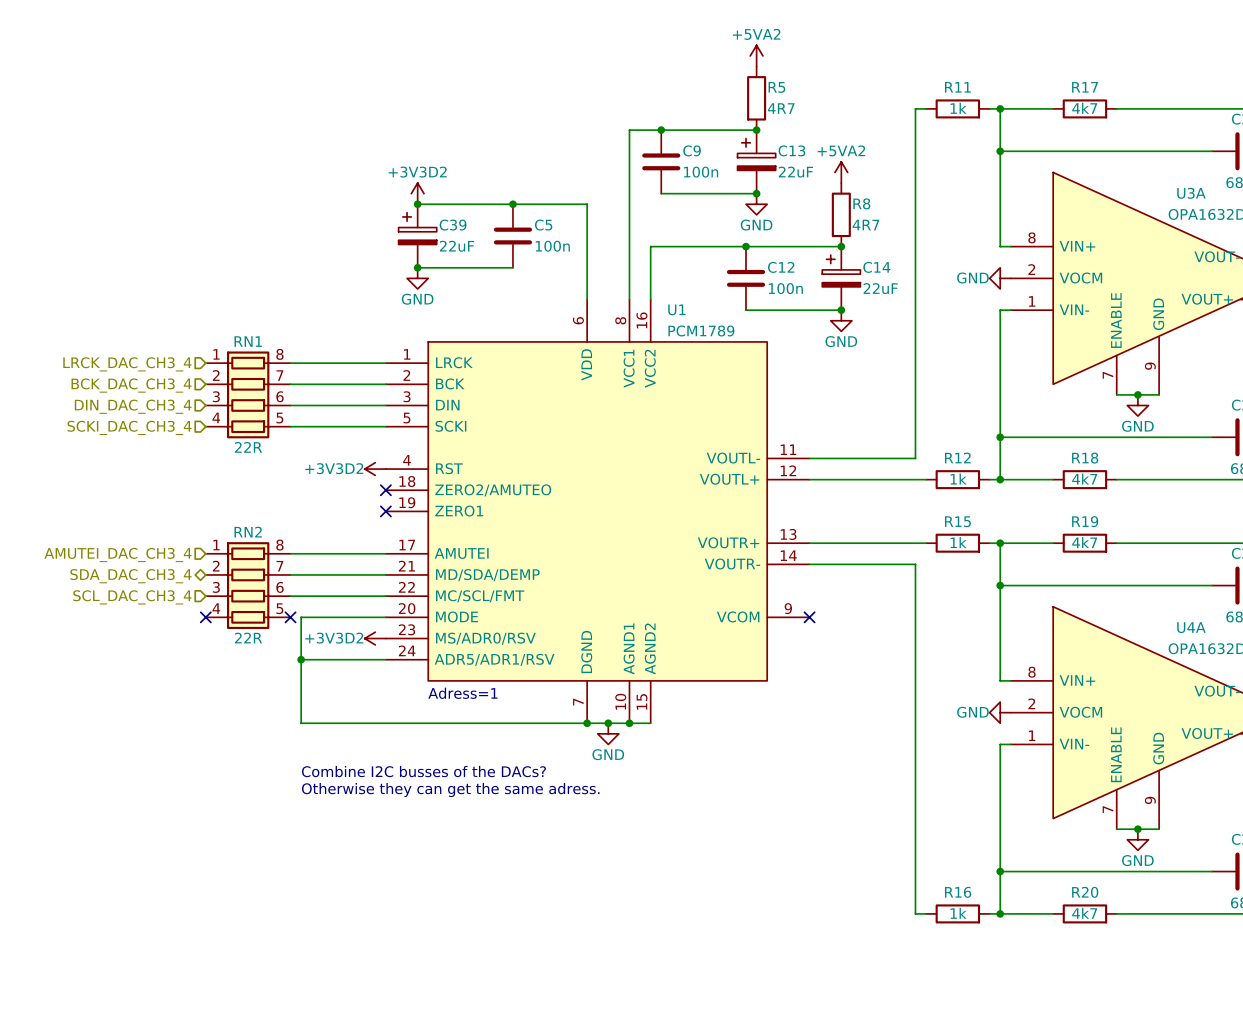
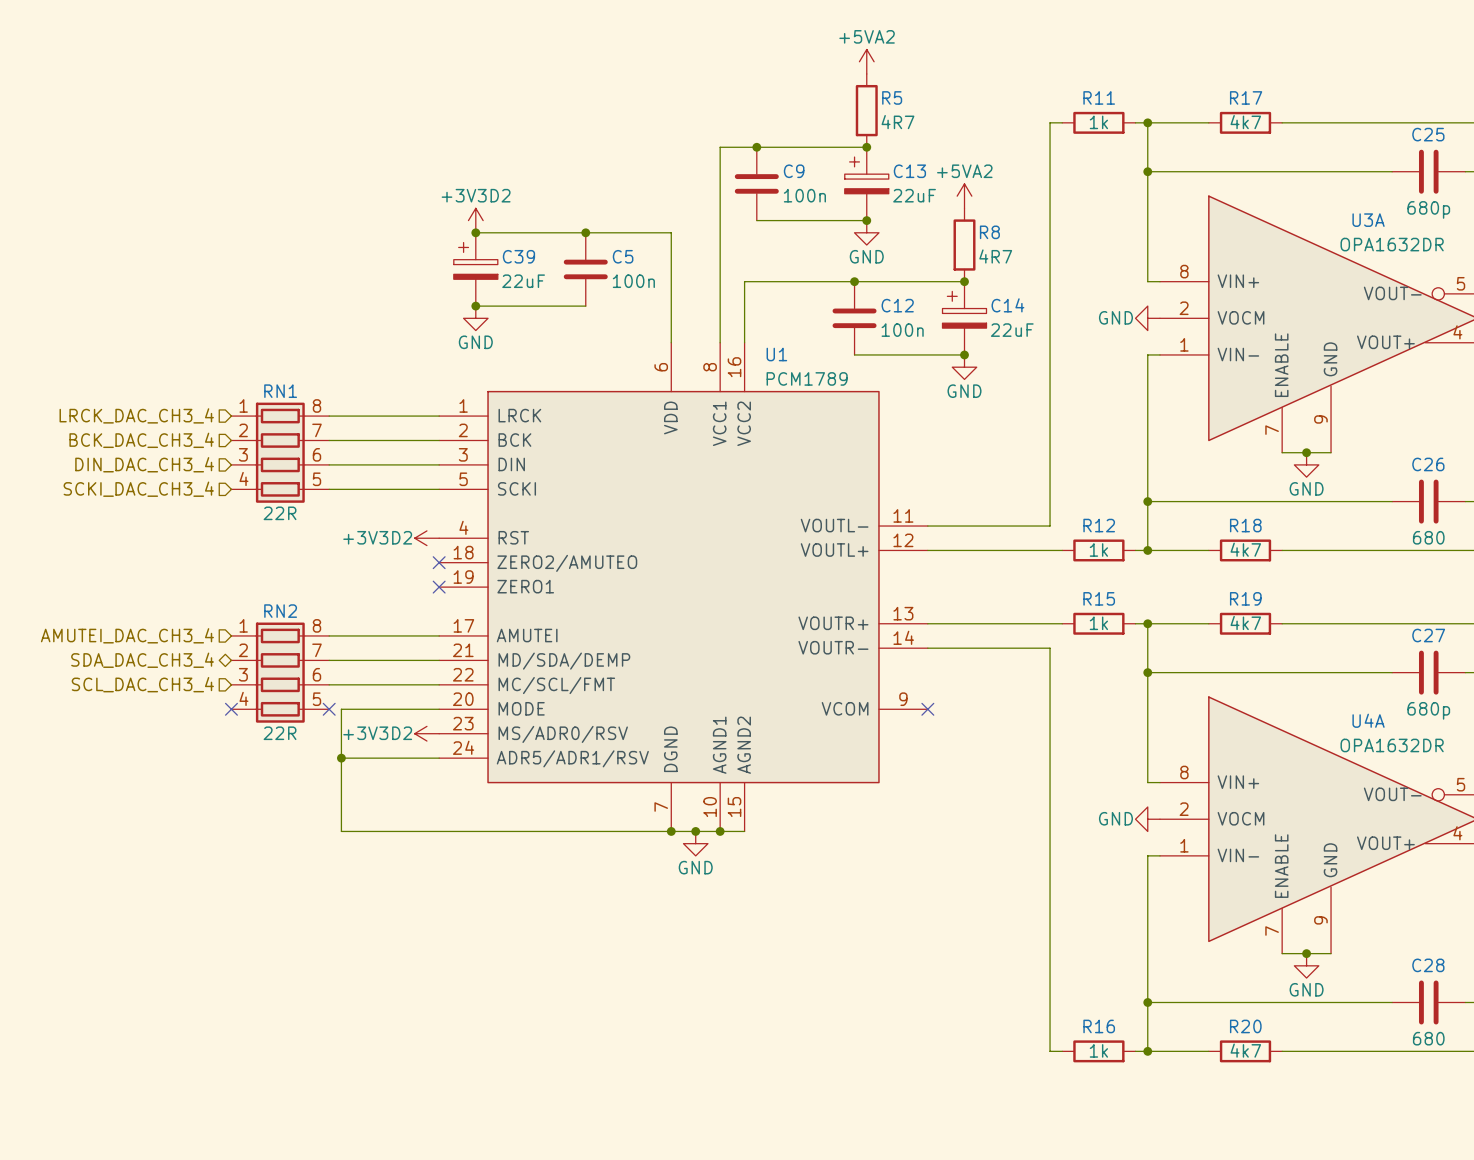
text: Adress=1 (462, 693) -> none
text: Combine I2C busses of the DACs? (423, 771) -> none
text: Otherwise they can get the same adress. (450, 790) -> none

